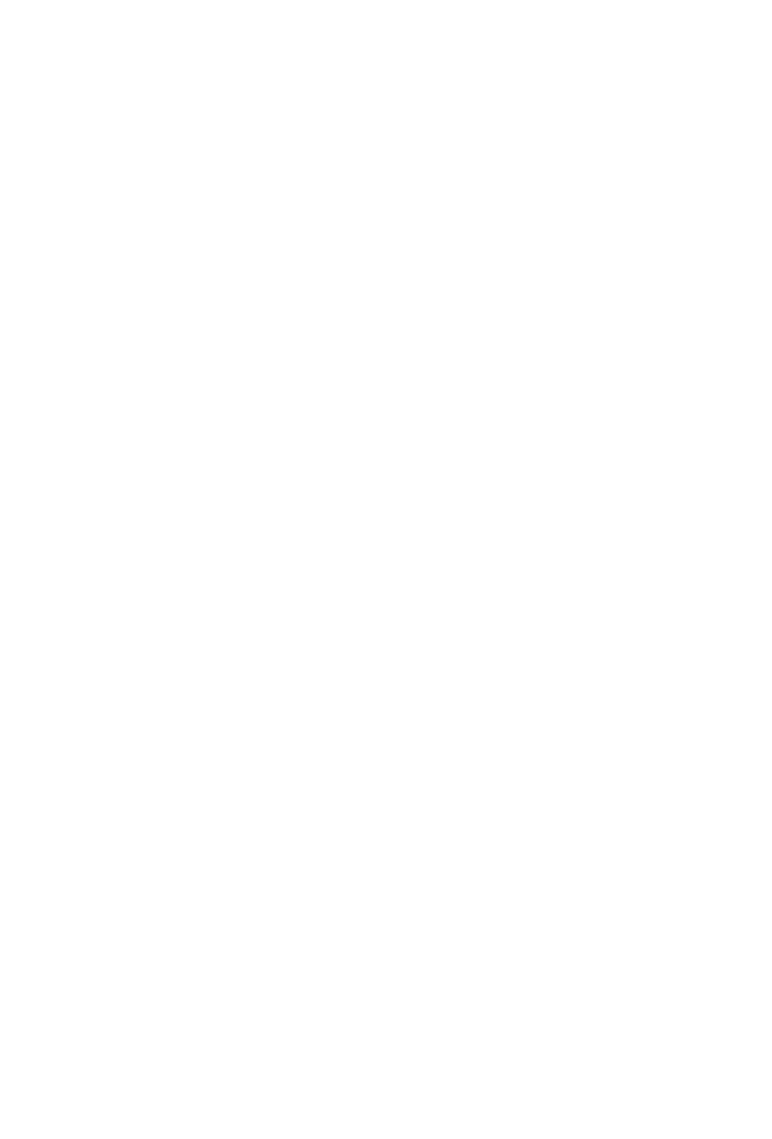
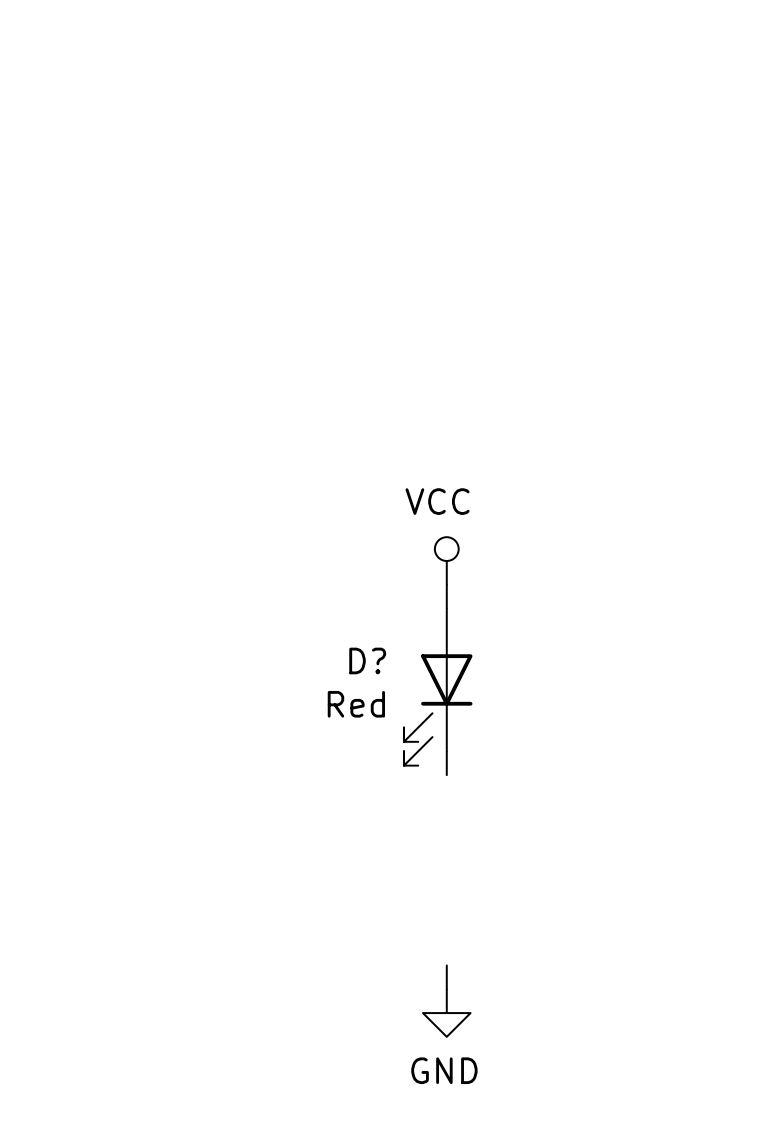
power symbol: none -> VCC (446, 560)
wire: none -> (446, 584) (446, 608)
D?: none -> Red (438, 687)
wire: none -> (446, 751) (446, 775)
wire: none -> (446, 965) (446, 989)
power symbol: none -> GND (446, 1013)

